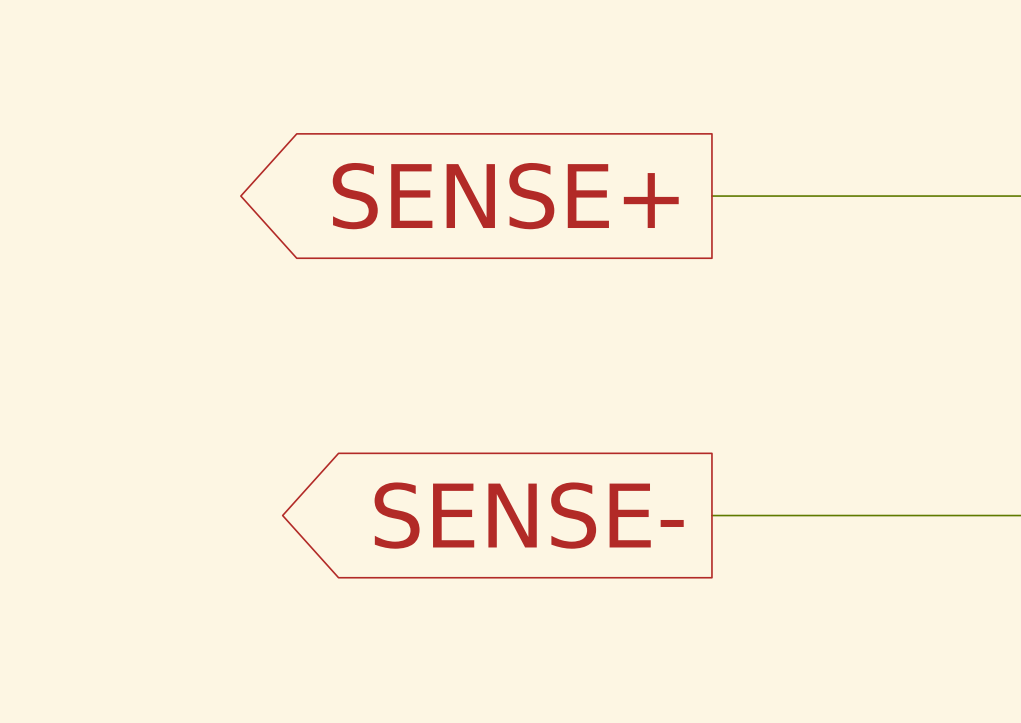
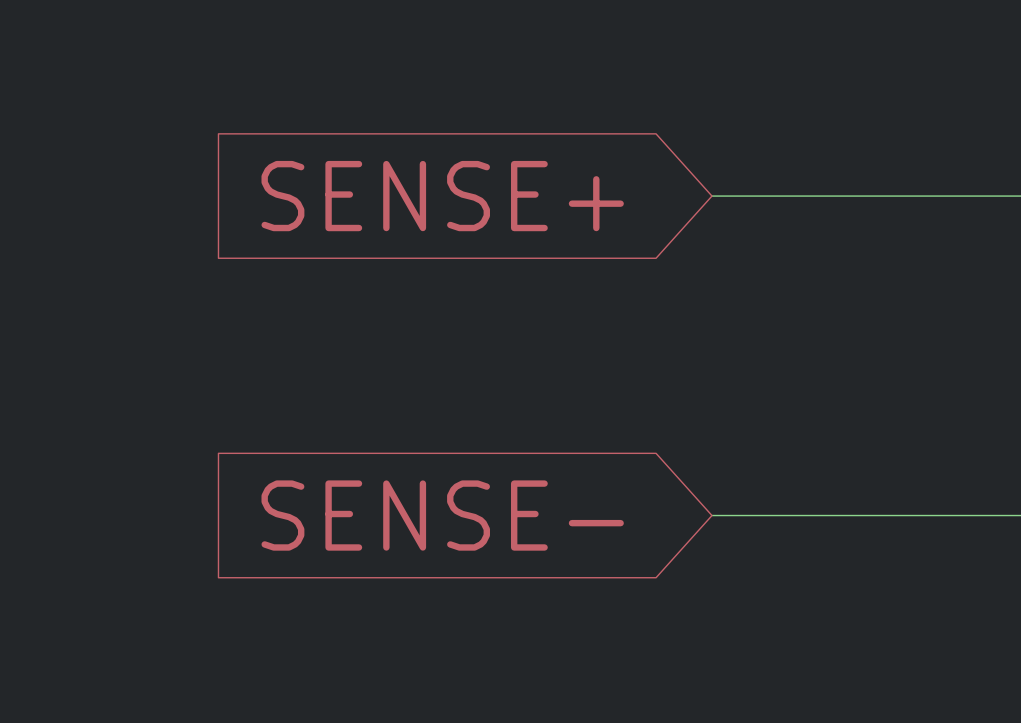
global label shape: output (505, 196) -> input (442, 196)
global label shape: output (529, 515) -> input (442, 515)

